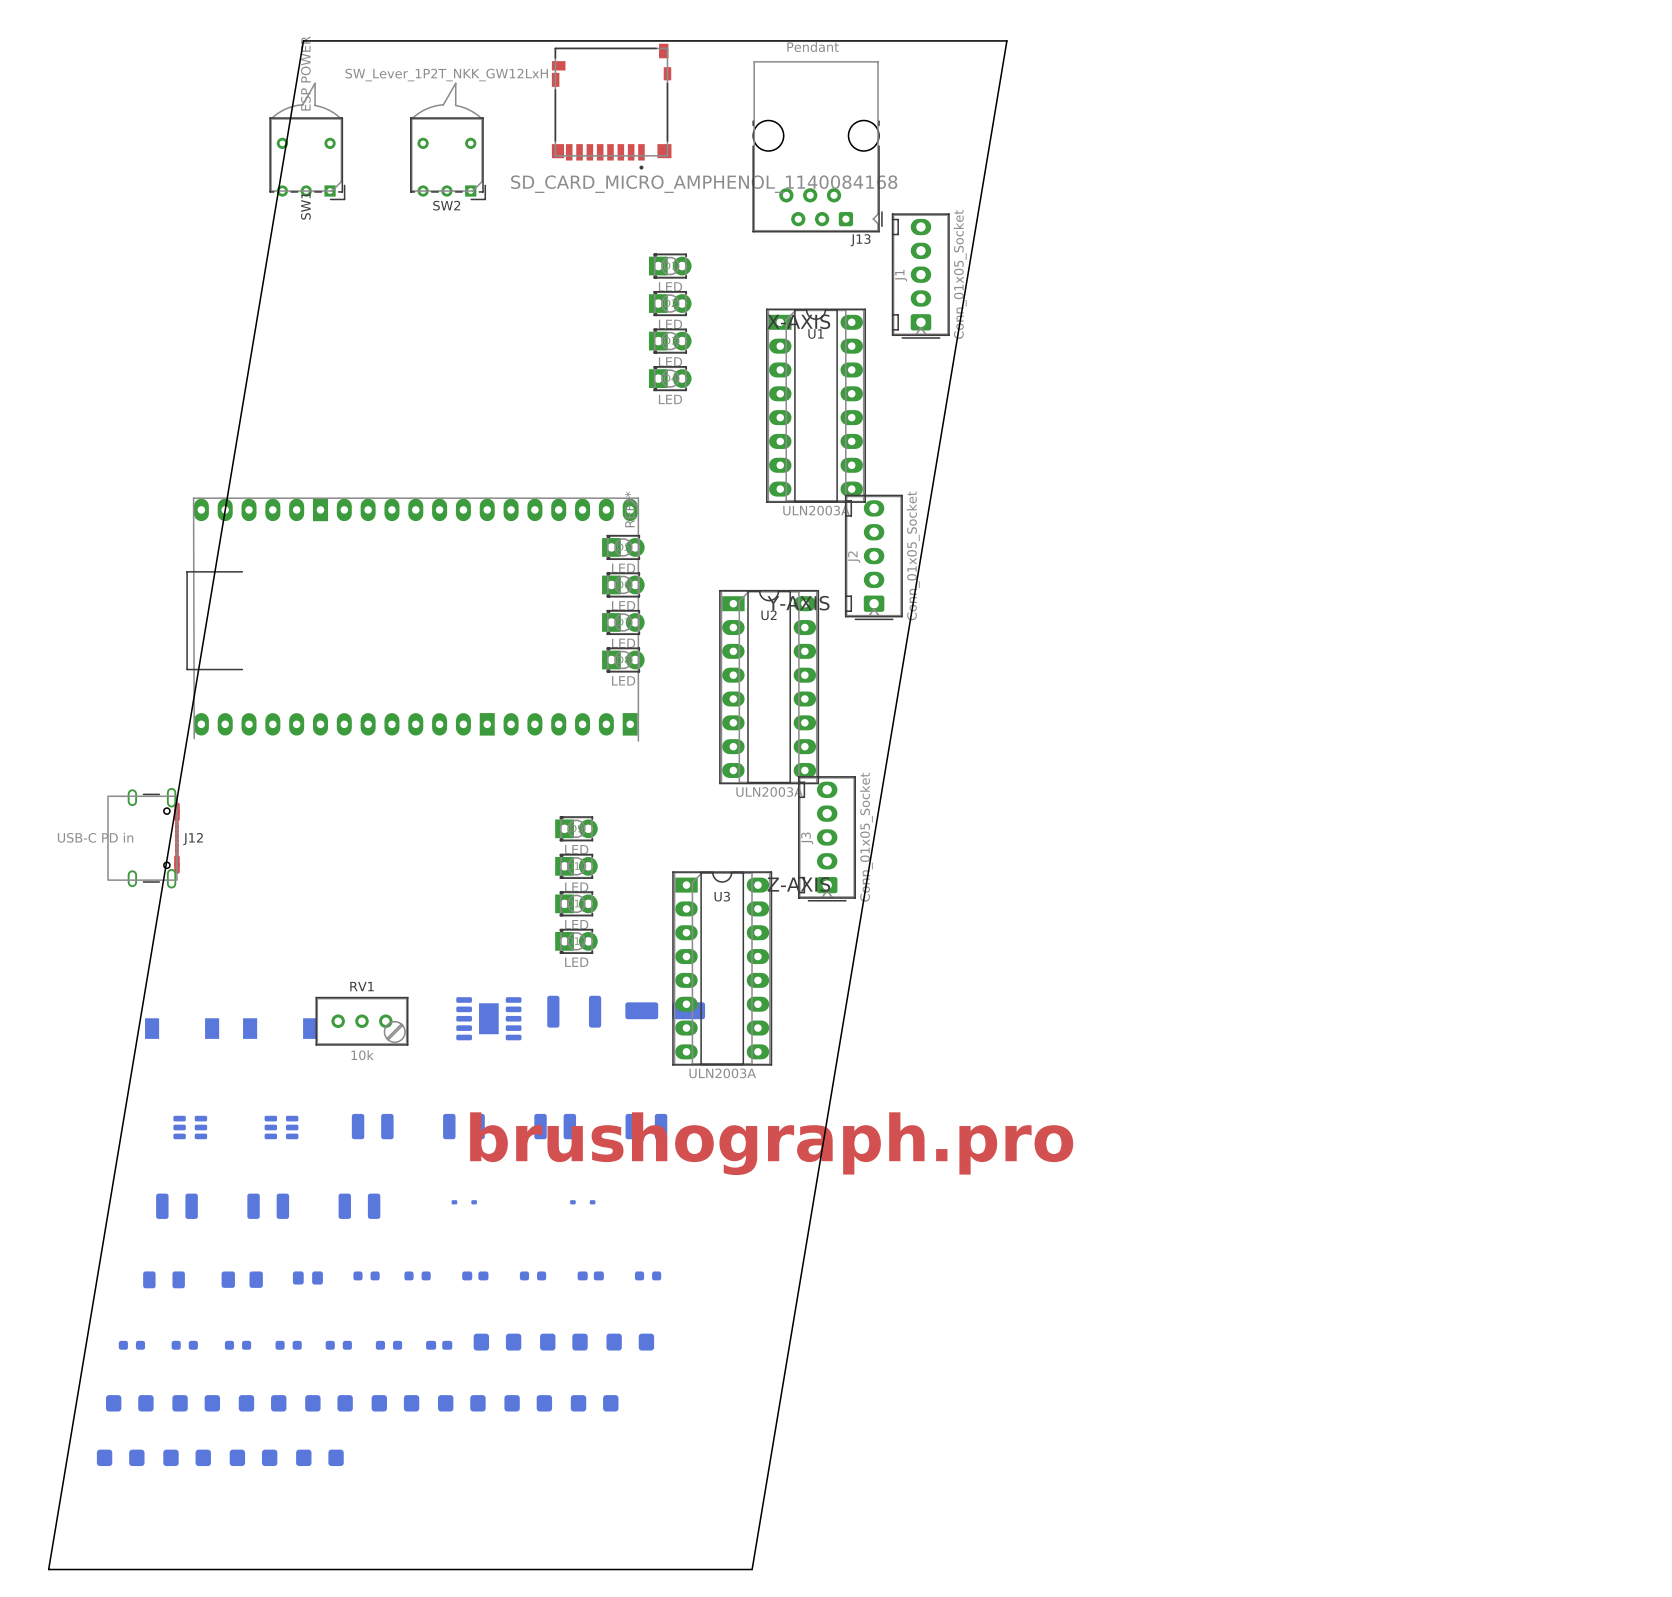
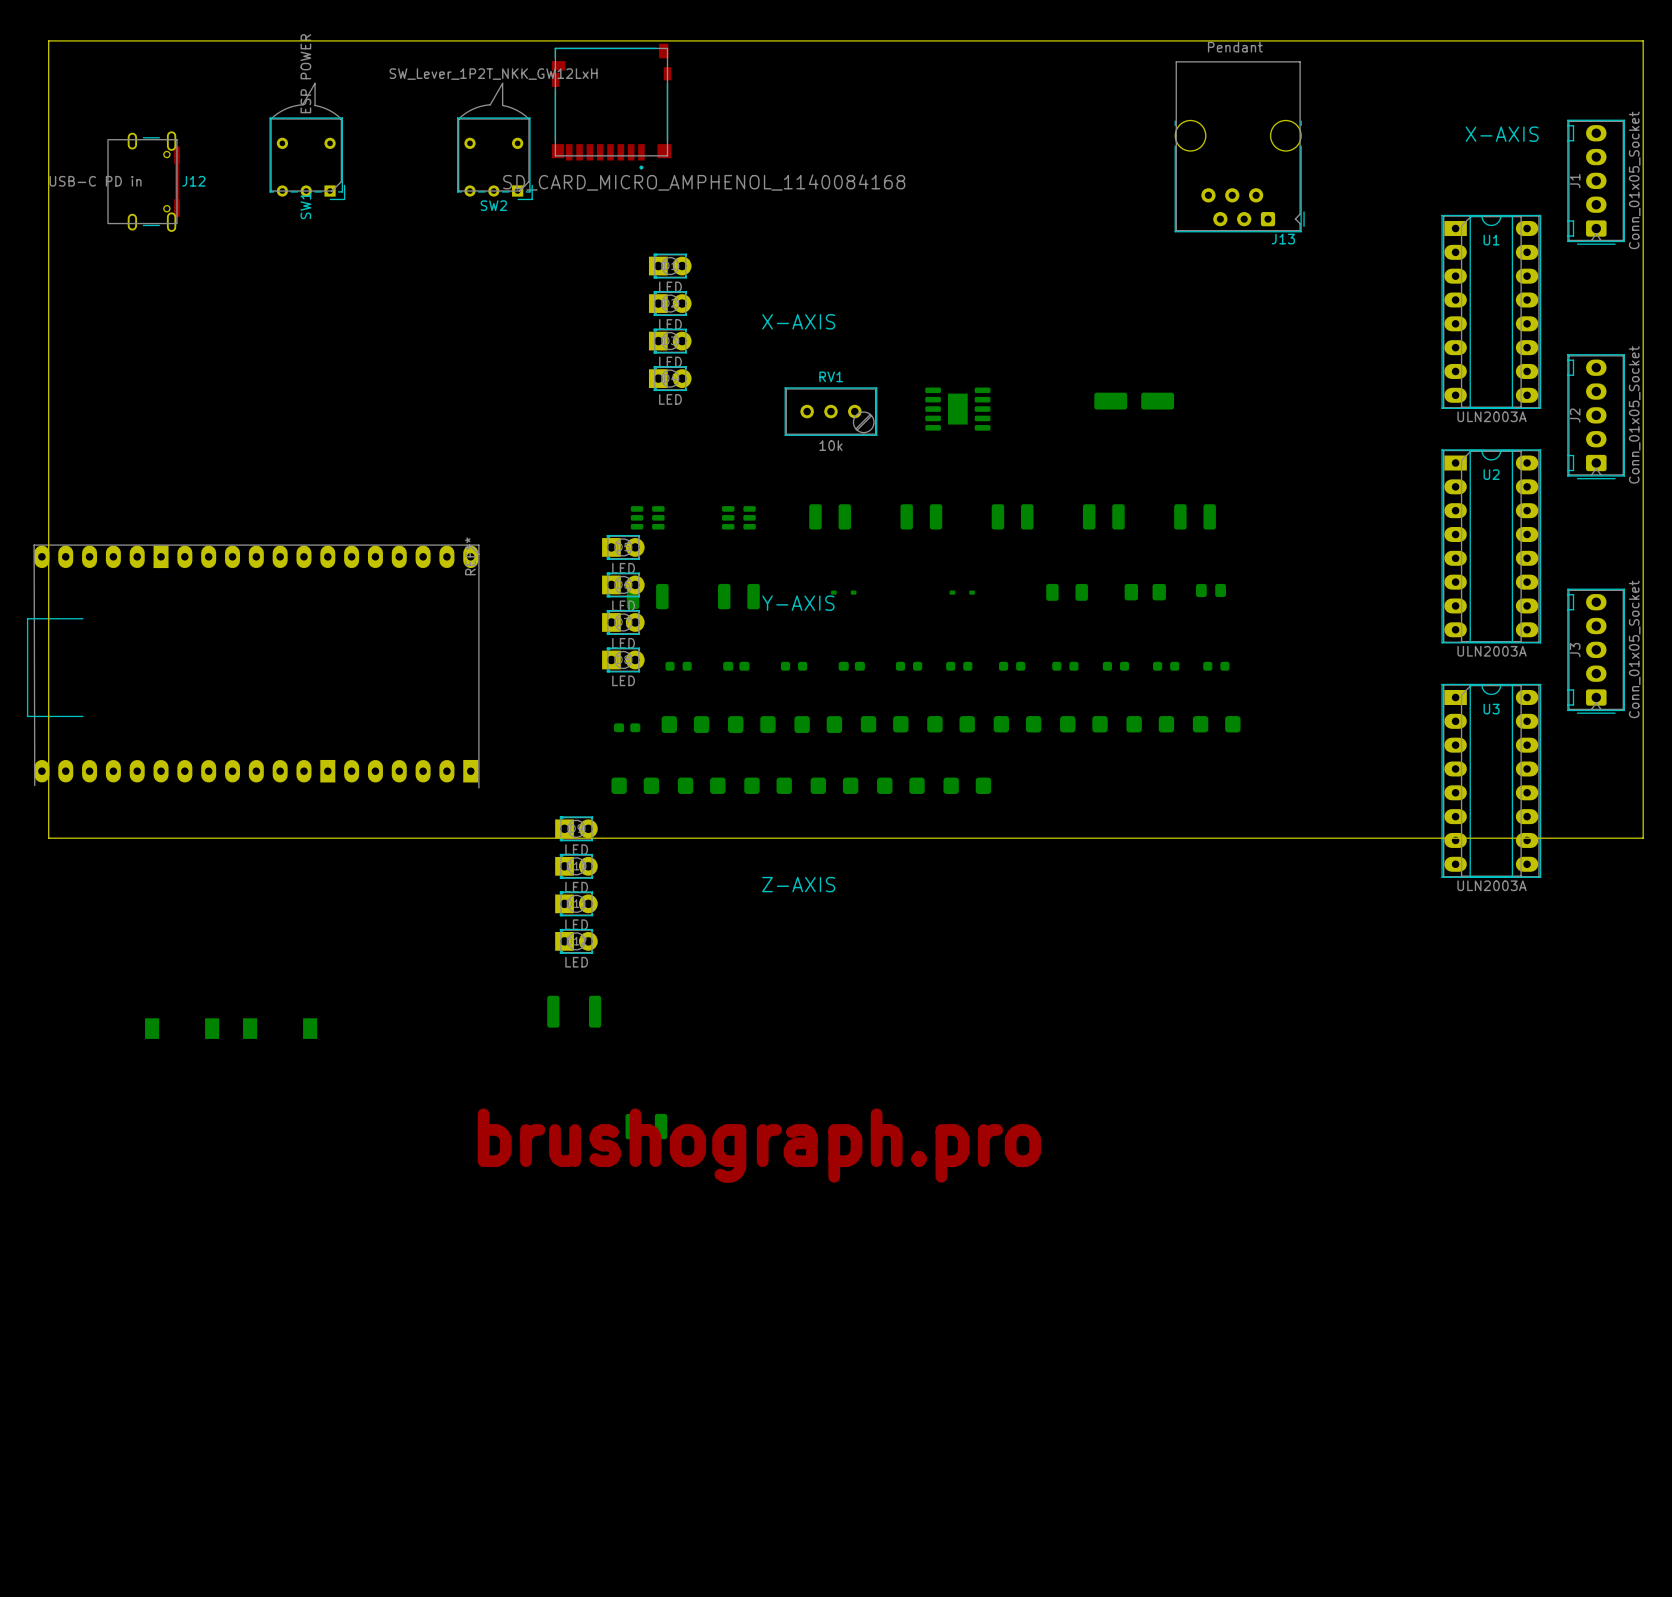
board edge: (303, 40) (48, 1569) (752, 1569) (1006, 40) -> (303, 40) (48, 40) (48, 838) (1643, 838) (1643, 40) (1006, 40)
text: none -> X-AXIS (1502, 134)
SW2 position: (448, 141) -> (494, 141)
J13 position: (817, 146) -> (1239, 146)
J1 position: (920, 276) -> (1596, 182)
part: none -> (1134, 401)
U1 position: (816, 405) -> (1491, 311)
part: none -> (957, 409)
part: none -> (830, 516)
part: none -> (921, 516)
part: none -> (1012, 516)
part: none -> (1103, 516)
part: none -> (1195, 516)
part: none -> (647, 517)
part: none -> (738, 517)
J2 position: (873, 557) -> (1596, 416)
part: none -> (1210, 590)
part: none -> (843, 592)
part: none -> (962, 592)
part: none -> (1067, 592)
part: none -> (1145, 592)
part: none -> (647, 596)
part: none -> (738, 596)
part position: (412, 619) -> (253, 666)
part: none -> (678, 666)
part: none -> (736, 666)
part: none -> (794, 666)
part: none -> (851, 666)
part: none -> (909, 666)
part: none -> (959, 666)
part: none -> (1012, 666)
part: none -> (1065, 666)
part: none -> (1115, 666)
part: none -> (1166, 666)
part: none -> (1216, 666)
U2 position: (769, 687) -> (1491, 546)
part: none -> (685, 724)
part: none -> (751, 724)
part: none -> (818, 724)
part: none -> (884, 724)
part: none -> (951, 724)
part: none -> (1017, 724)
part: none -> (1083, 724)
part: none -> (1150, 724)
part: none -> (1216, 724)
part: none -> (627, 727)
part: none -> (635, 785)
part: none -> (701, 785)
part: none -> (768, 785)
part: none -> (834, 785)
part: none -> (900, 785)
part: none -> (967, 785)
J12 position: (143, 838) -> (143, 181)
J3 position: (826, 838) -> (1596, 651)
U3 position: (722, 968) -> (1491, 780)
part: (665, 1010) -> none
part: (488, 1018) -> none
RV1 position: (361, 1021) -> (830, 411)
part: (372, 1126) -> none
part: (463, 1126) -> none
part: (555, 1126) -> none
part: (190, 1127) -> none
part: (281, 1127) -> none
part: (464, 1202) -> none
part: (582, 1202) -> none
part: (176, 1206) -> none
part: (268, 1206) -> none
part: (359, 1206) -> none
part: (366, 1275) -> none
part: (417, 1275) -> none
part: (475, 1275) -> none
part: (533, 1275) -> none
part: (590, 1275) -> none
part: (648, 1275) -> none
part: (307, 1277) -> none
part: (164, 1279) -> none
part: (242, 1279) -> none
part: (497, 1342) -> none
part: (563, 1342) -> none
part: (630, 1342) -> none
part: (131, 1345) -> none
part: (184, 1345) -> none
part: (238, 1345) -> none
part: (288, 1345) -> none
part: (338, 1345) -> none
part: (388, 1345) -> none
part: (439, 1345) -> none
part: (129, 1403) -> none
part: (196, 1403) -> none
part: (262, 1403) -> none
part: (329, 1403) -> none
part: (395, 1403) -> none
part: (461, 1403) -> none
part: (528, 1403) -> none
part: (594, 1403) -> none
part: (120, 1457) -> none
part: (187, 1457) -> none
part: (253, 1457) -> none
part: (319, 1457) -> none

